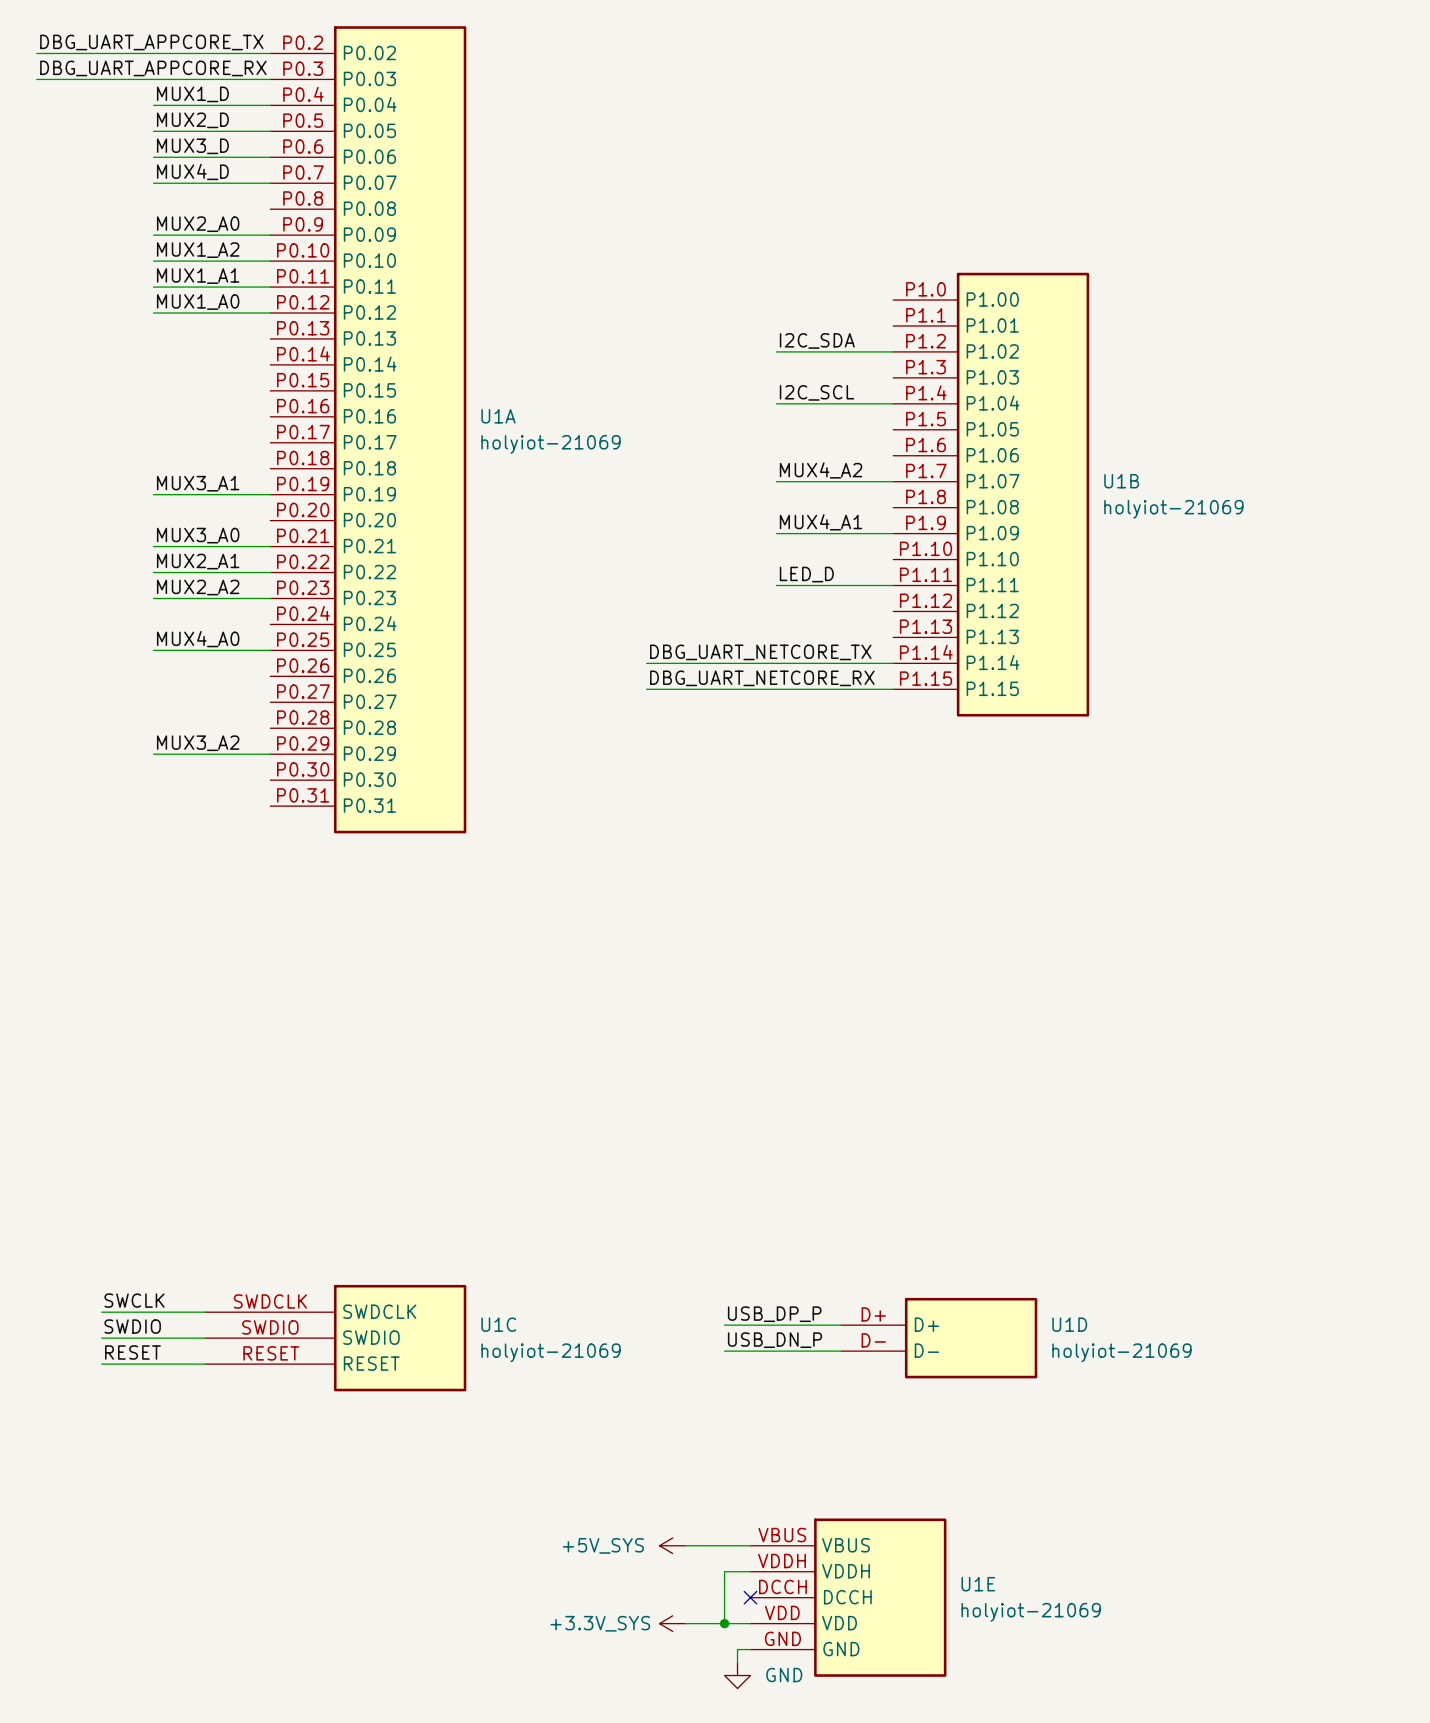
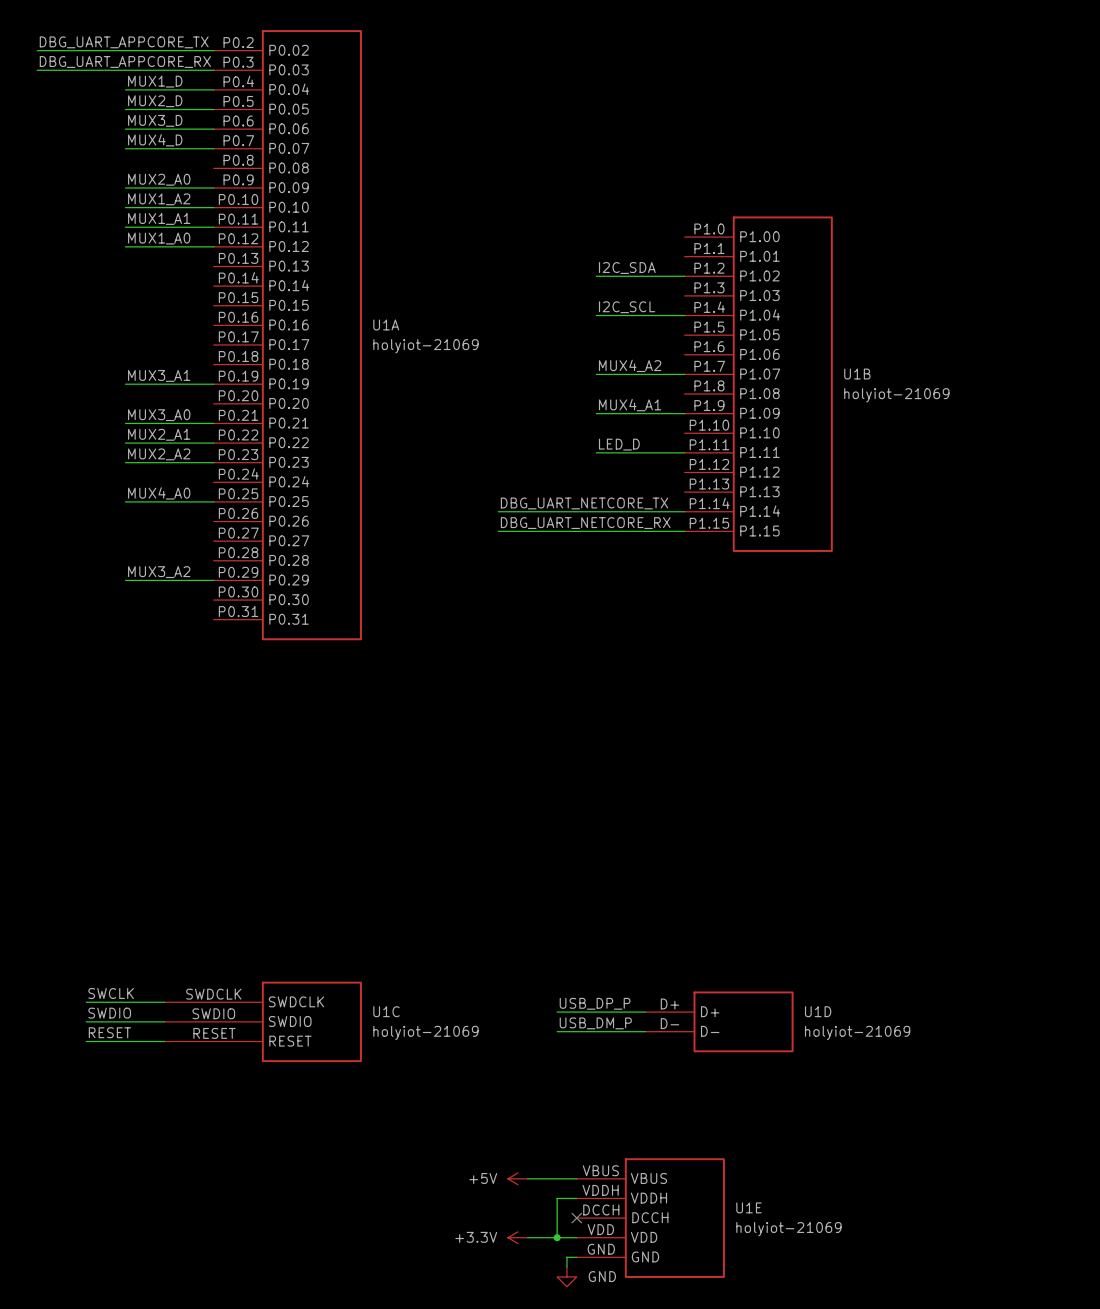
label: USB_DN_P (775, 1340) -> USB_DM_P (595, 1023)
power symbol: +5V_SYS (672, 1545) -> +5V (517, 1178)
power symbol: +3.3V_SYS (672, 1623) -> +3.3V (517, 1237)

